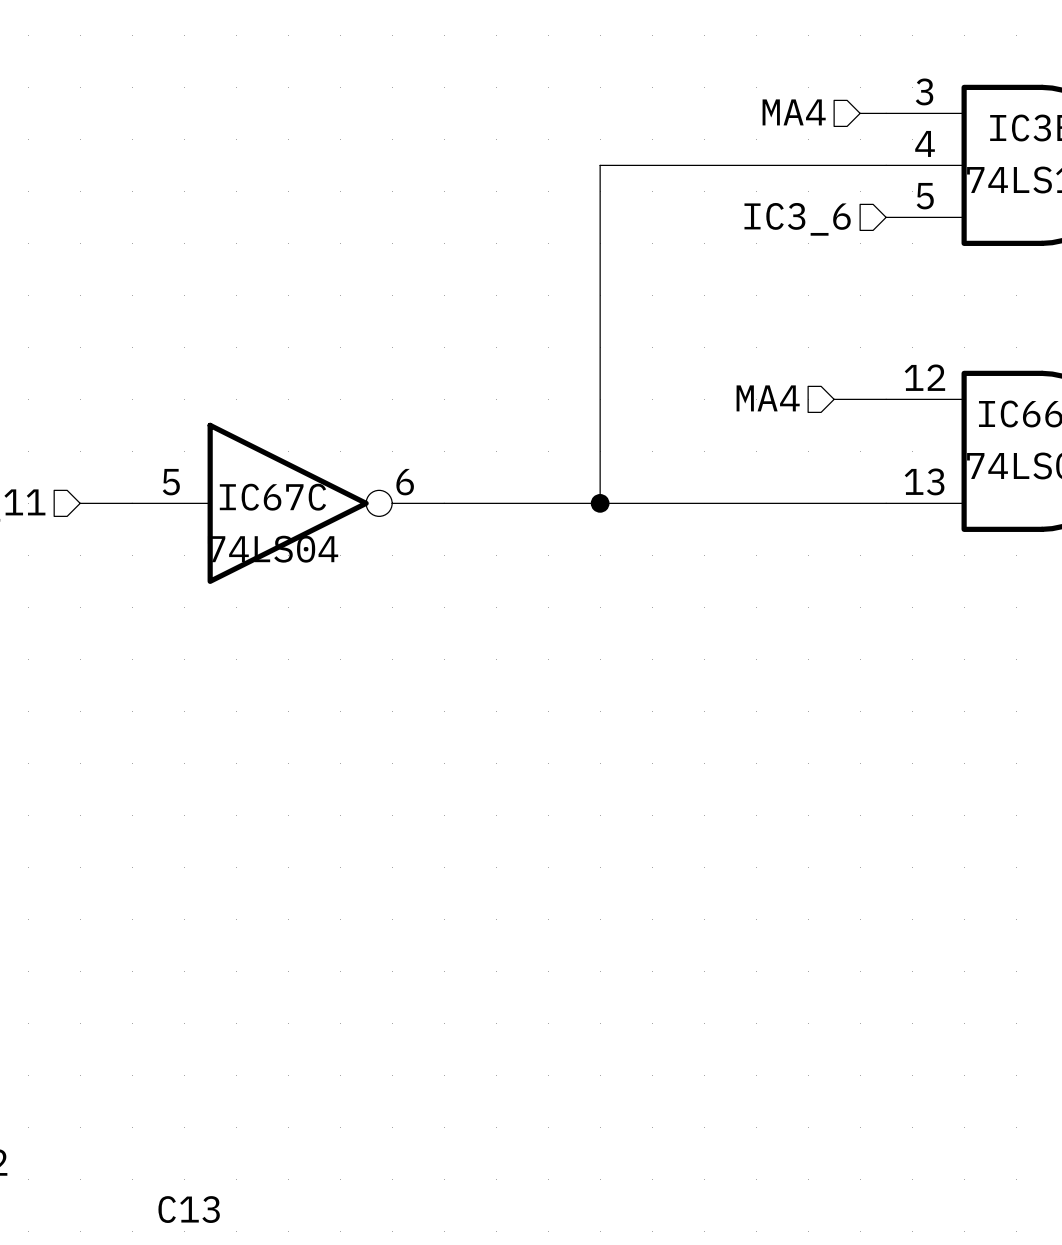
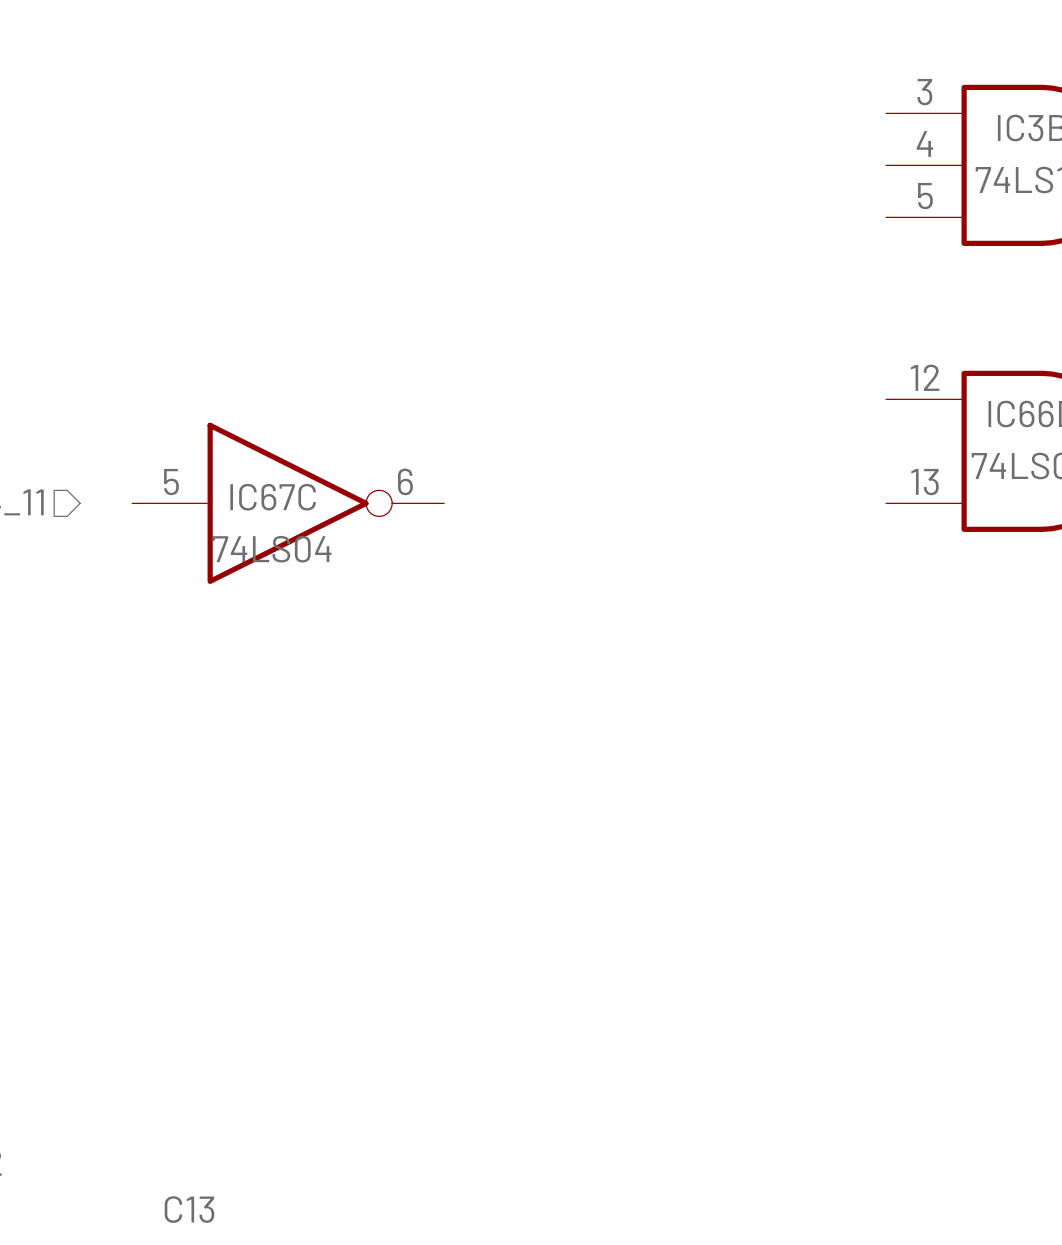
hierarchical label: MA4 (794, 112) -> none
wire: (860, 113) (886, 113) -> none
wire: (886, 165) (600, 165) (600, 503) -> none
hierarchical label: IC3_6 (797, 219) -> none
hierarchical label: MA4 (768, 398) -> none
wire: (834, 399) (886, 399) -> none
wire: (80, 503) (132, 503) -> none
wire: (444, 503) (886, 503) -> none
junction: (600, 503) -> none

